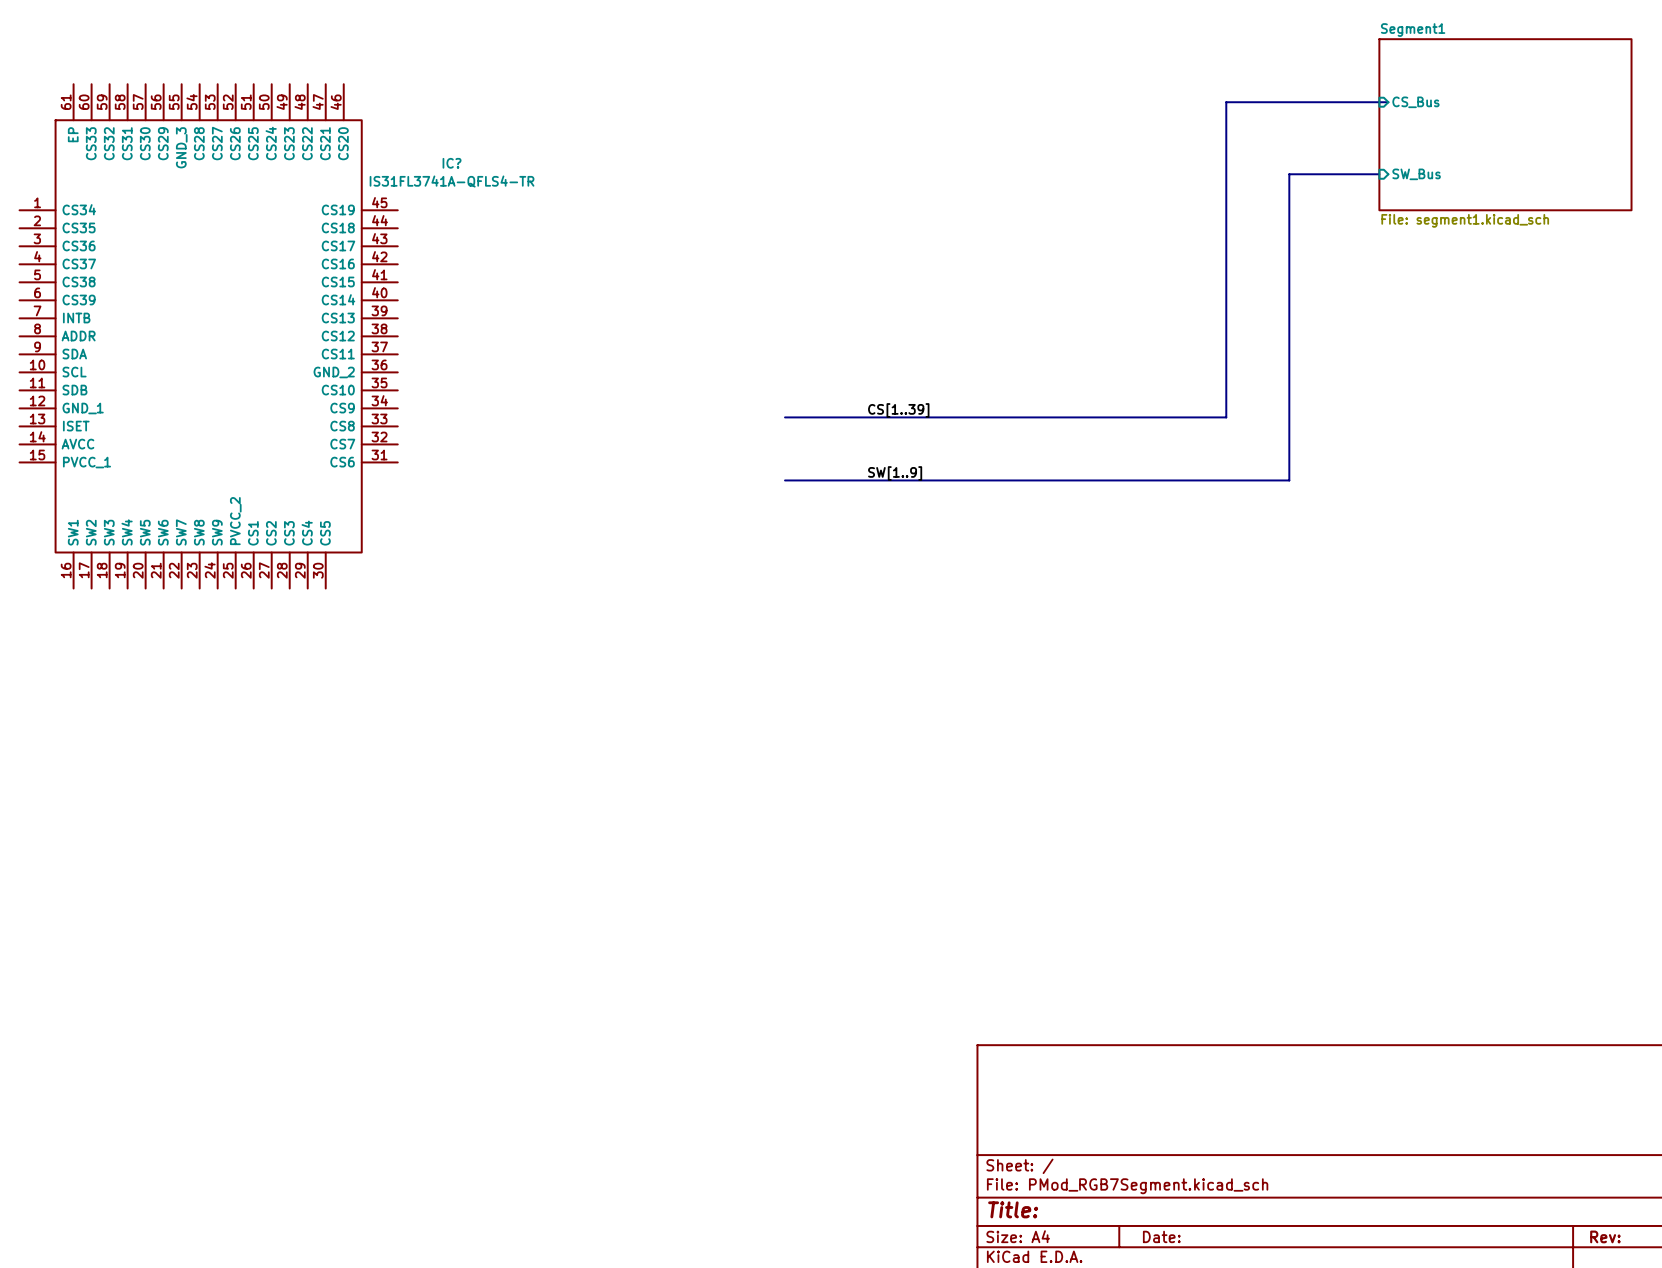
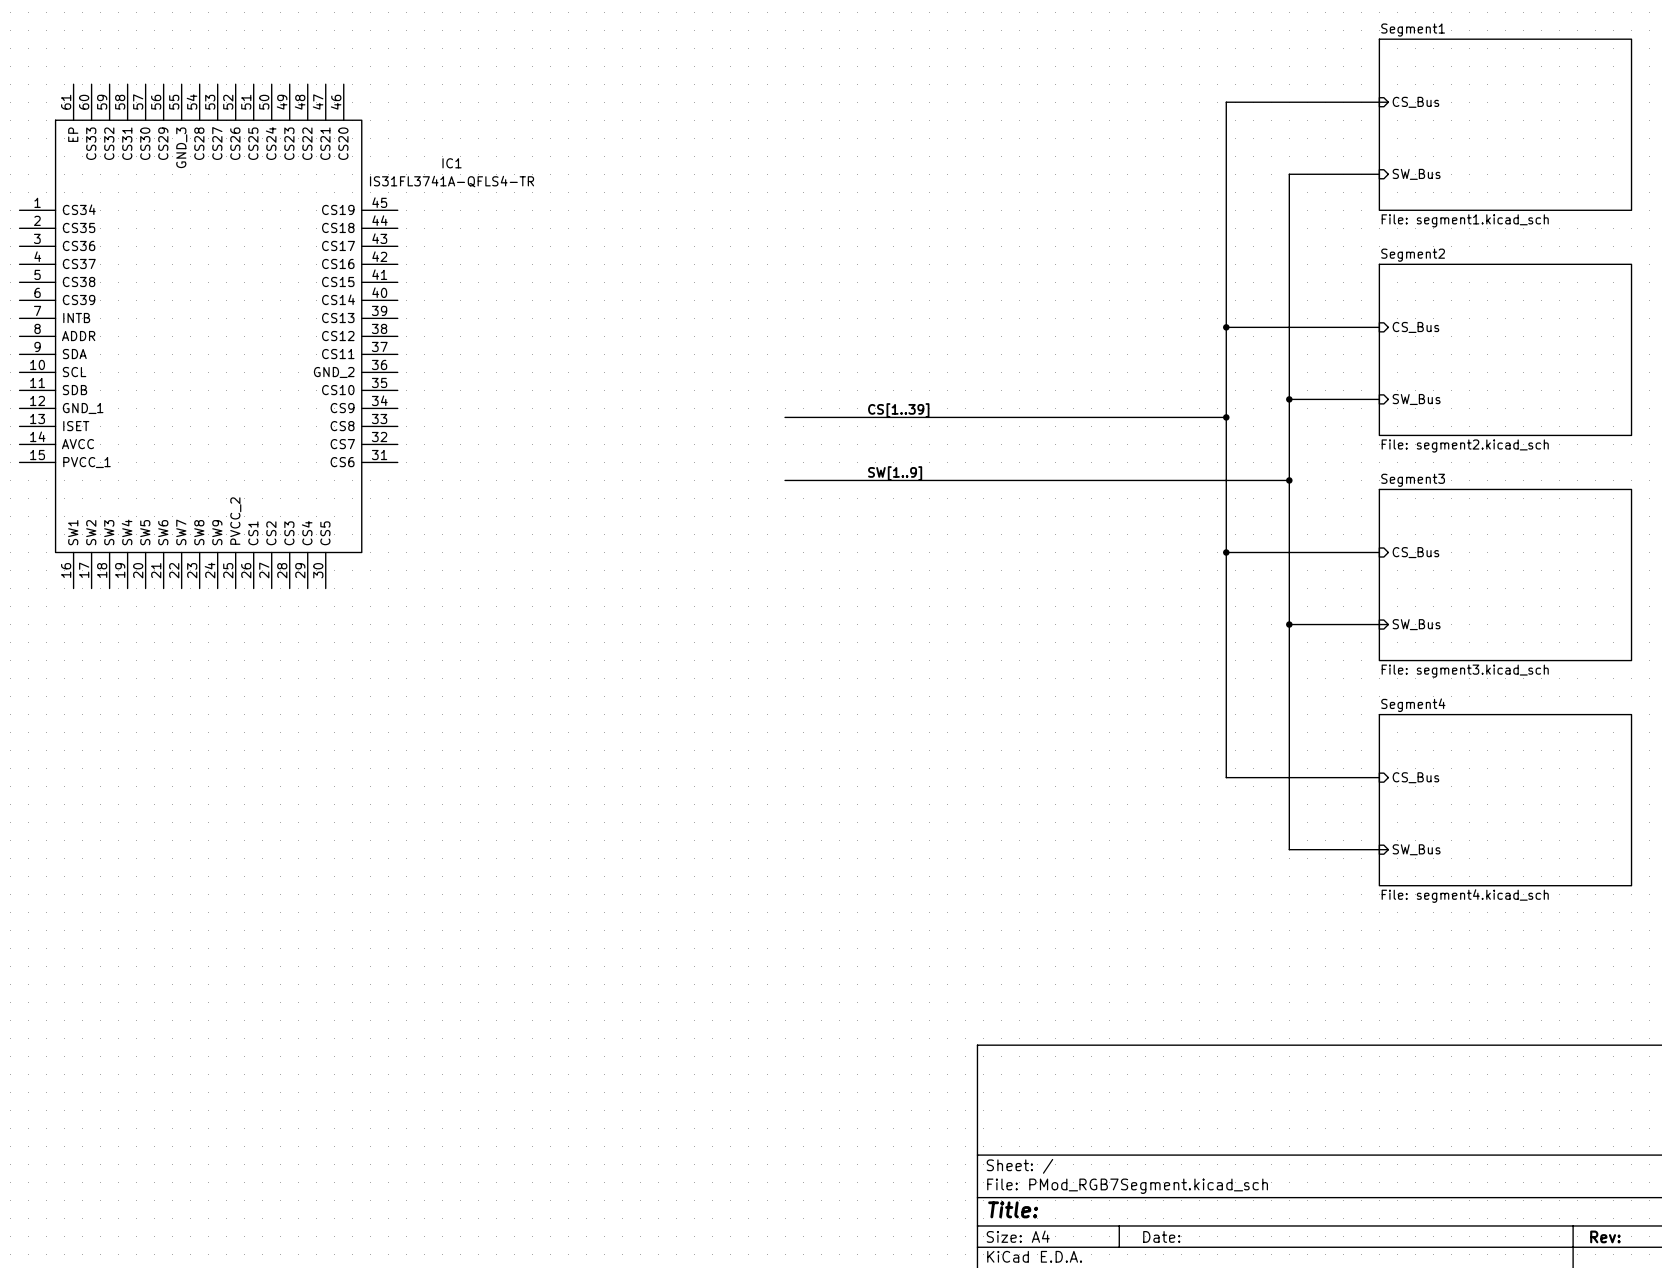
IC? name: IC? (452, 163) -> IC1 (452, 163)
bus: none -> (1226, 327) (1379, 327)
junction: none -> (1226, 327)
sheet pin: none -> CS_Bus (1415, 327)
sheet Segment2: none -> File: segment2.kicad_sch (1505, 349)
bus: none -> (1289, 399) (1379, 399)
junction: none -> (1289, 399)
sheet pin: none -> SW_Bus (1416, 399)
bus: none -> (1226, 417) (1226, 777) (1379, 777)
junction: none -> (1226, 417)
bus: none -> (1289, 480) (1289, 849) (1388, 849)
junction: none -> (1289, 480)
bus: none -> (1226, 552) (1379, 552)
junction: none -> (1226, 552)
sheet pin: none -> CS_Bus (1415, 552)
sheet Segment3: none -> File: segment3.kicad_sch (1505, 575)
bus: none -> (1289, 624) (1388, 624)
junction: none -> (1289, 624)
sheet pin: none -> SW_Bus (1416, 624)
sheet pin: none -> CS_Bus (1415, 777)
sheet Segment4: none -> File: segment4.kicad_sch (1505, 800)
sheet pin: none -> SW_Bus (1416, 849)

